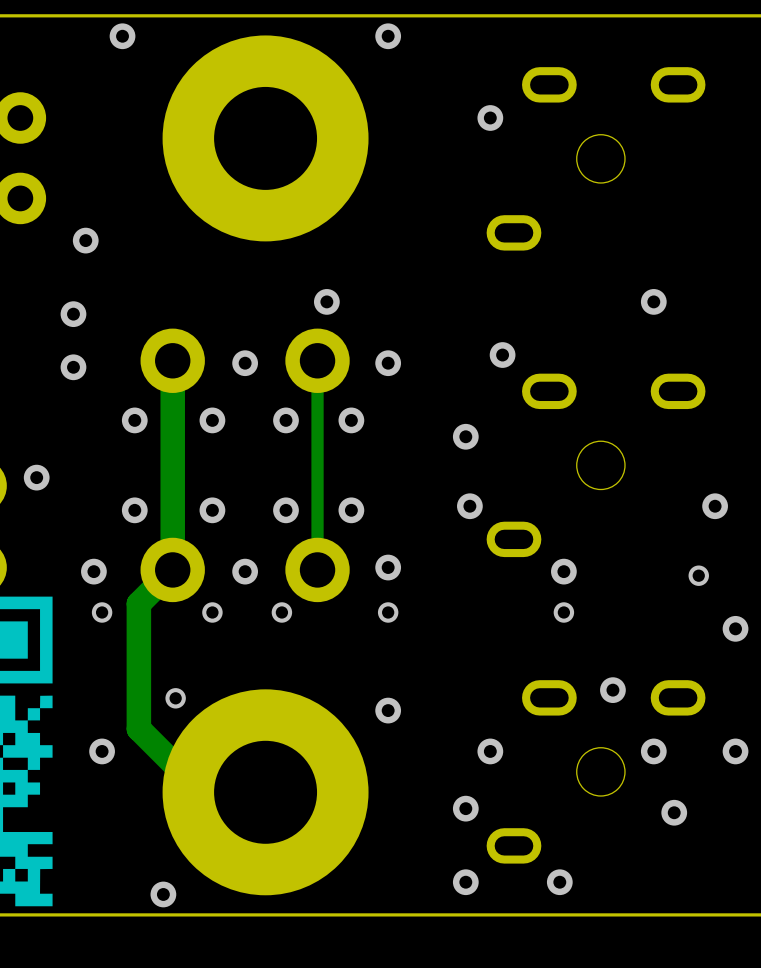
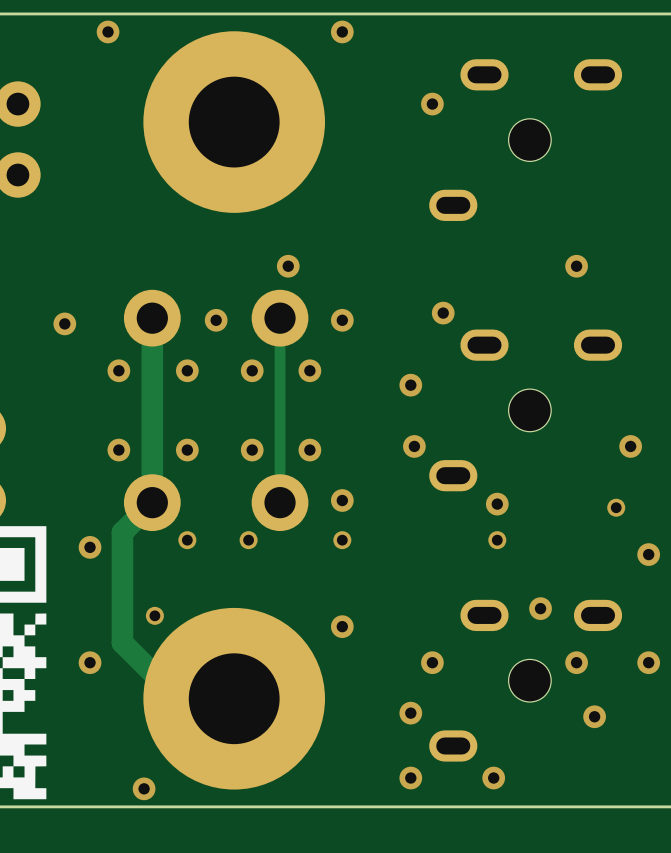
via: (85, 240) -> none
via: (73, 314) -> none
via: (36, 477) -> none
via position: (93, 571) -> (90, 547)
via: (245, 571) -> none
via: (102, 612) -> none

